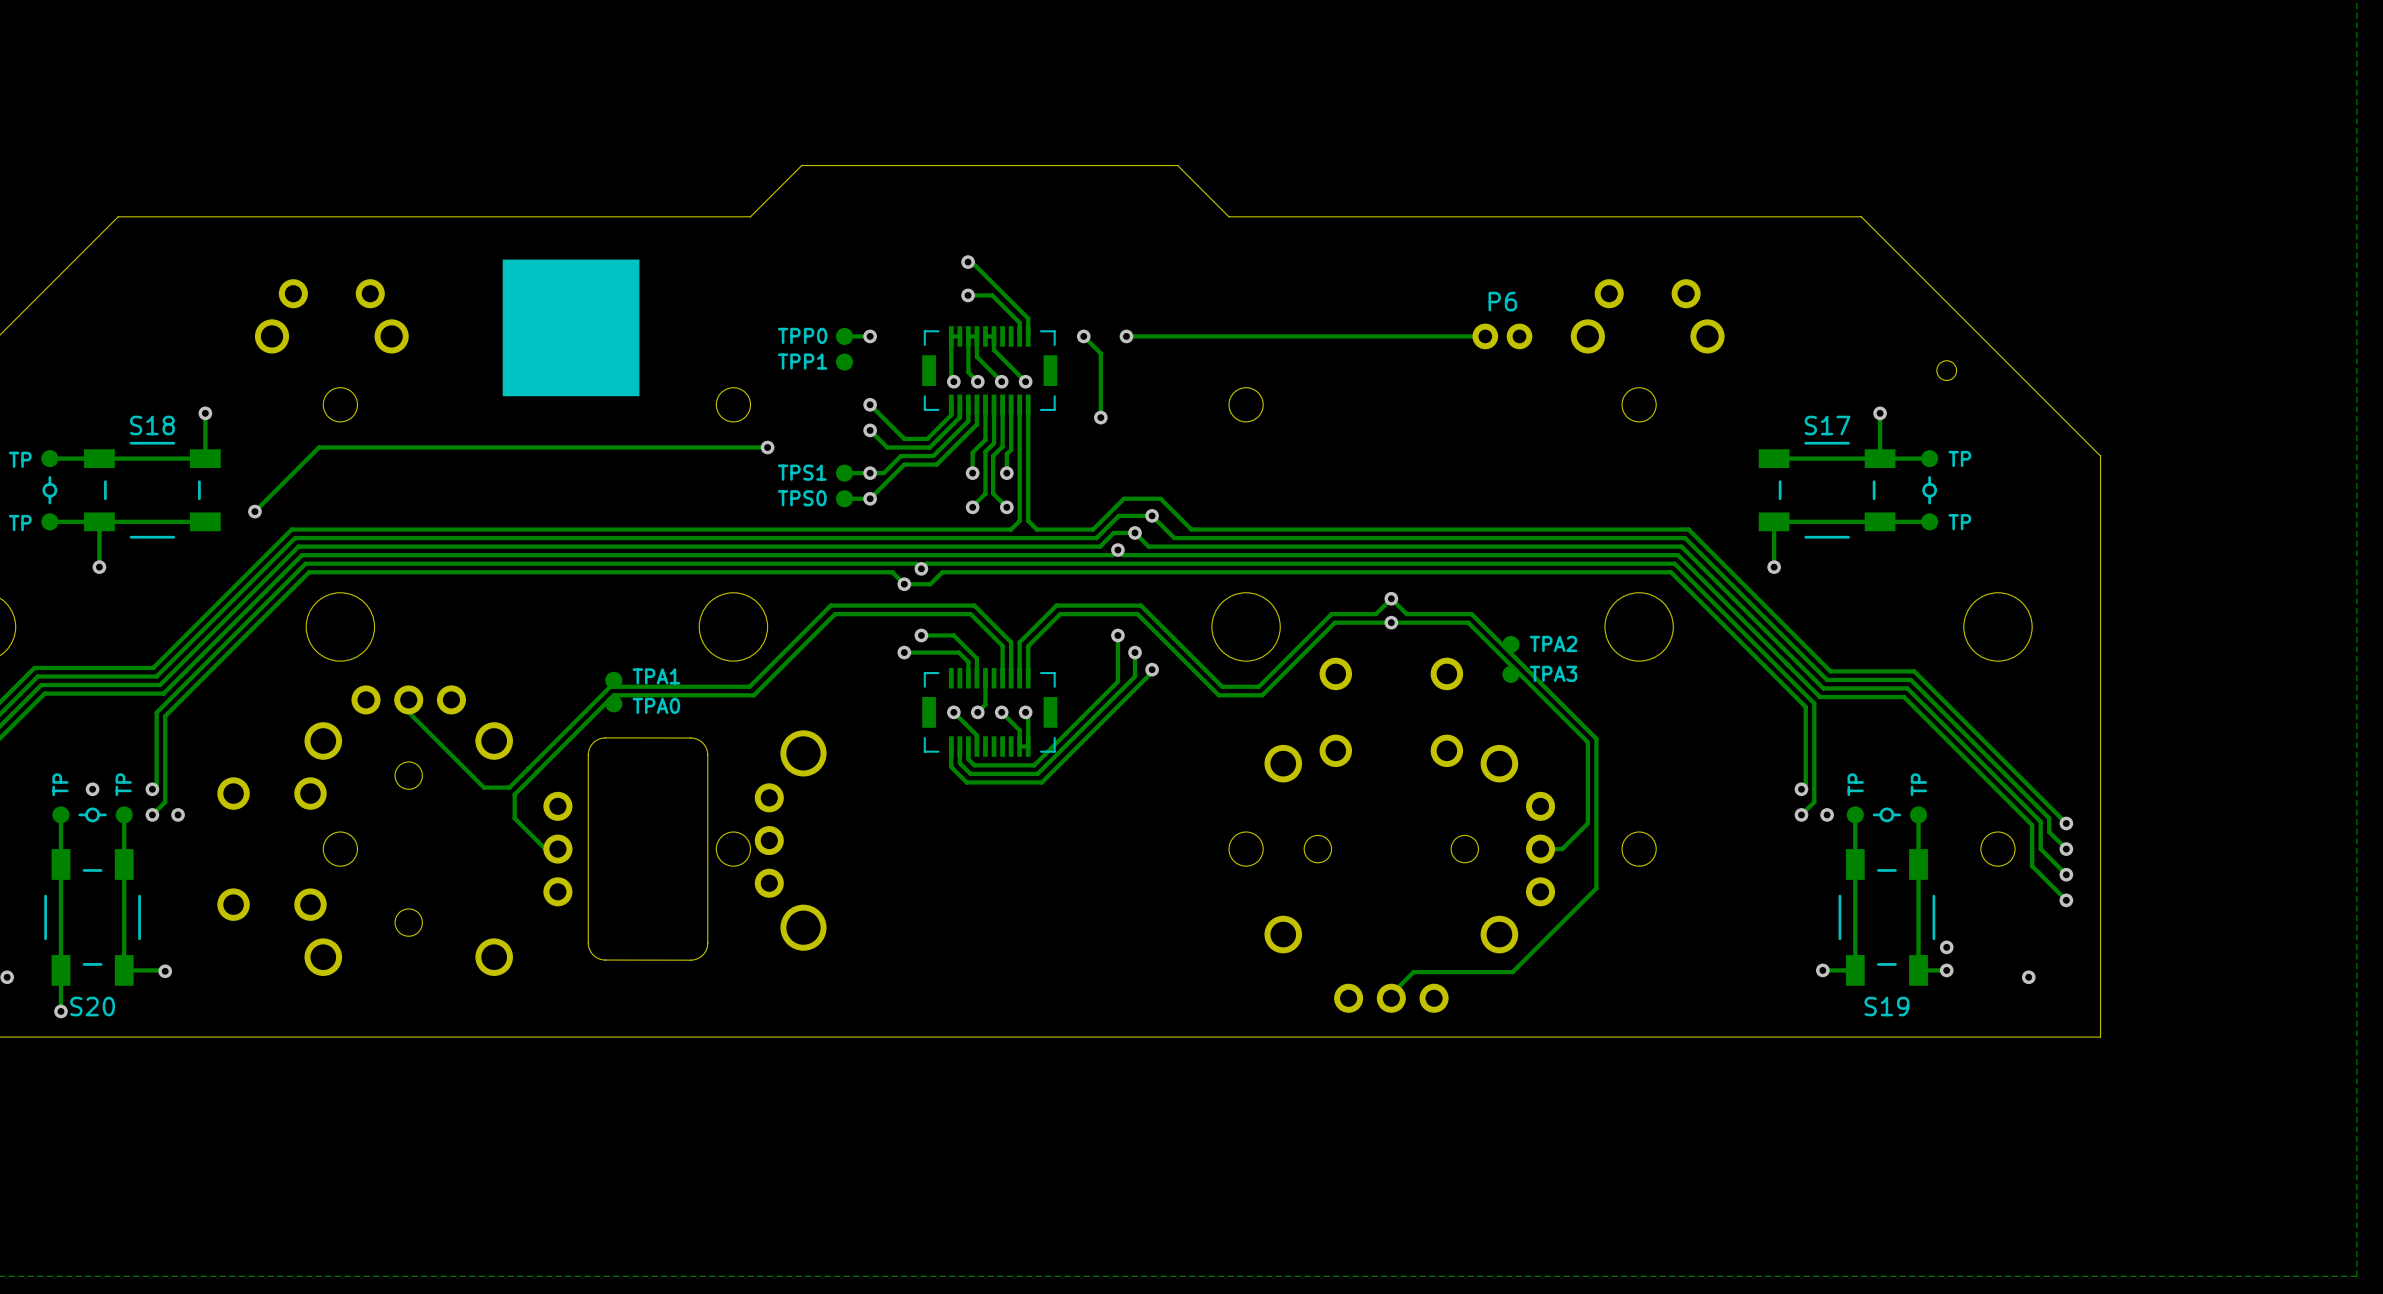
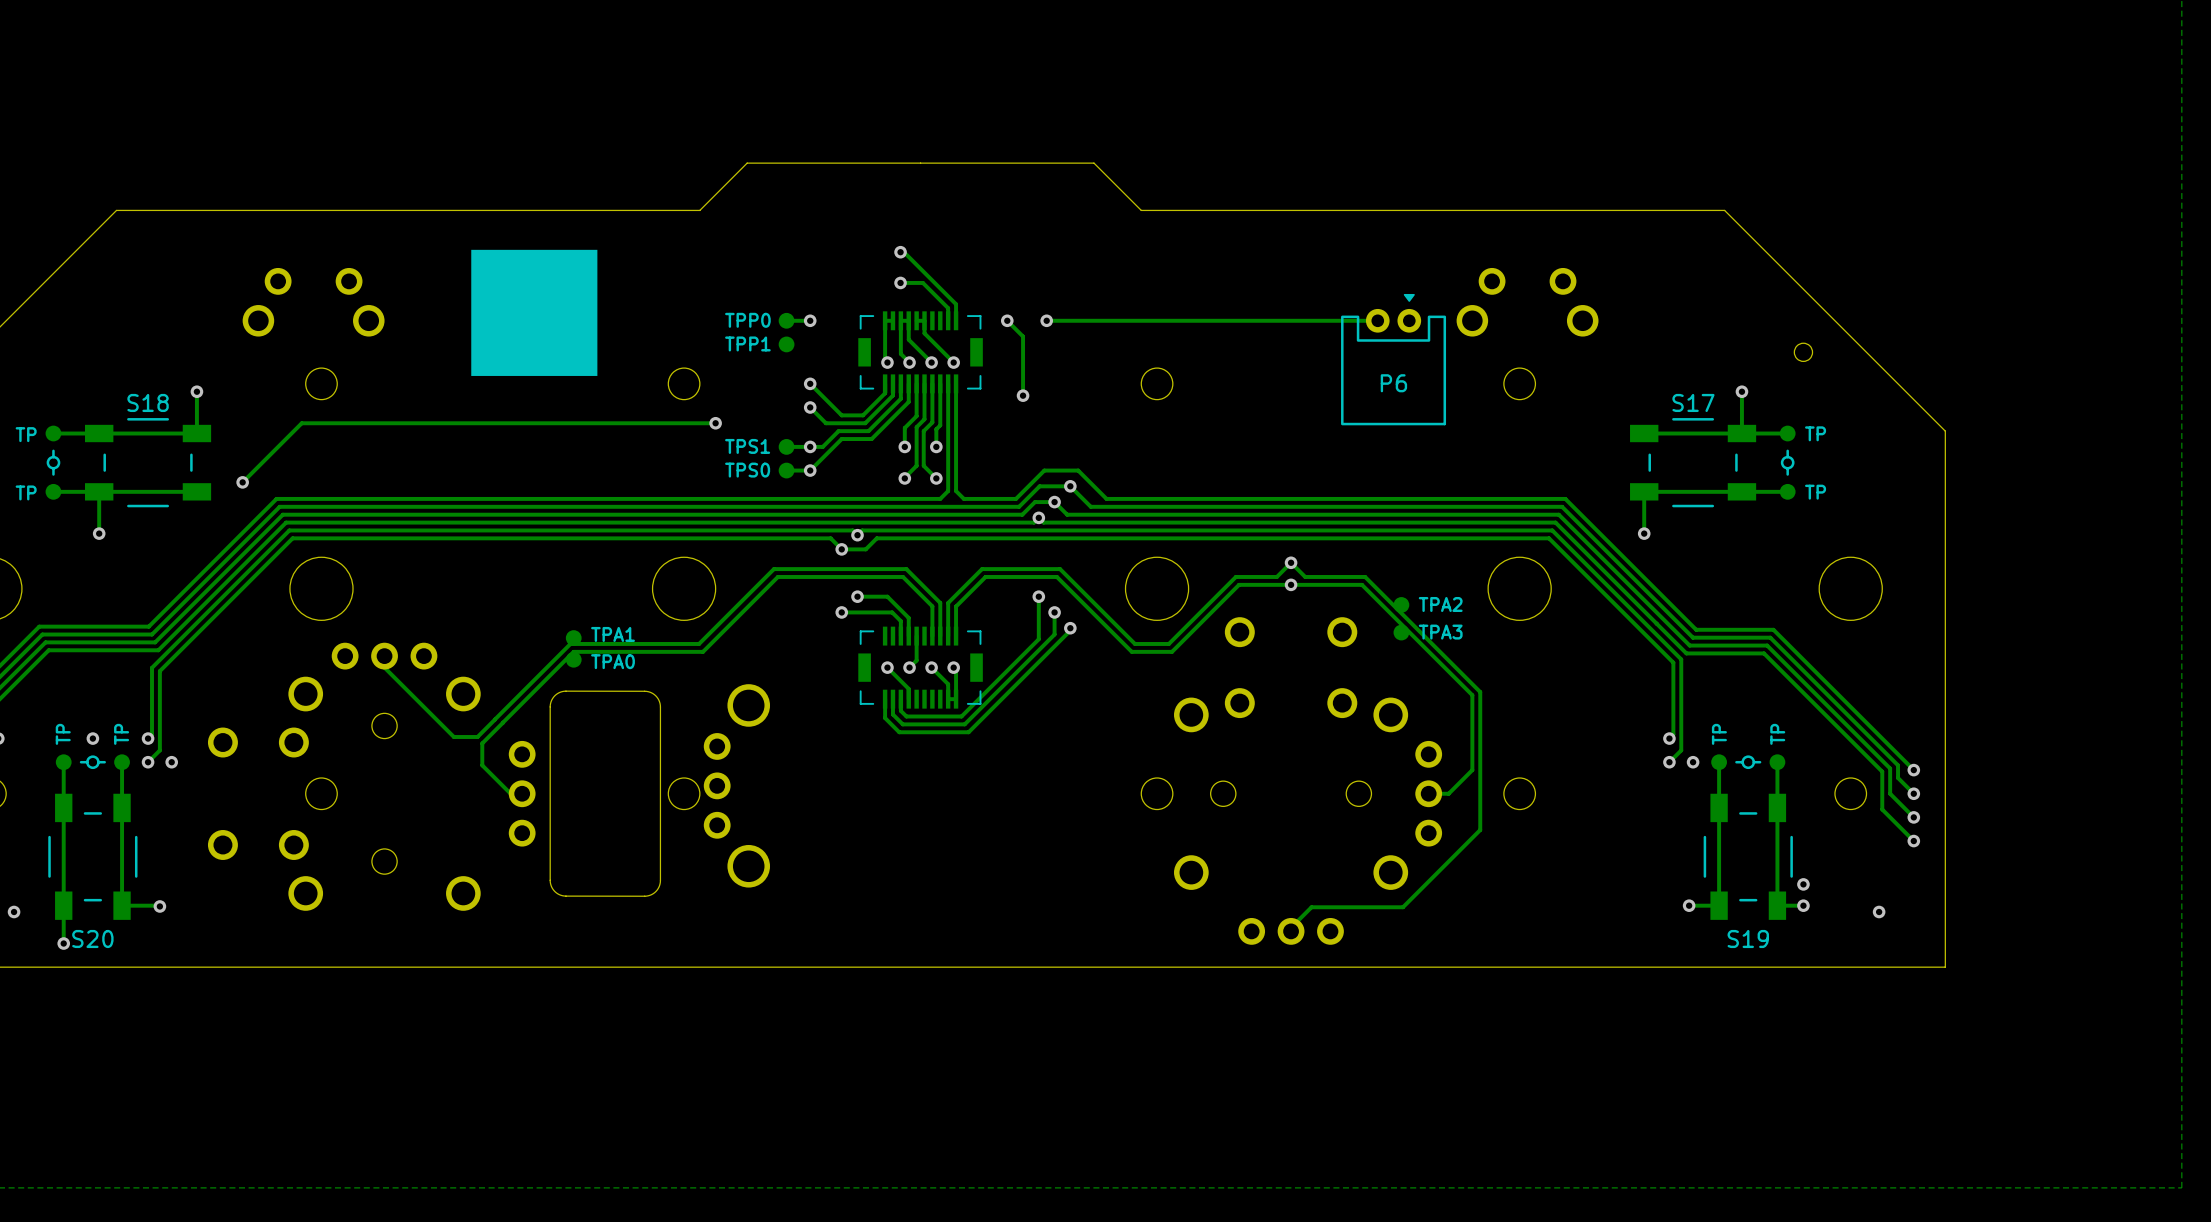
P6 name position: P6 (1502, 301) -> P6 (1393, 383)
P6 footprint: [1472, 323, 1533, 350] -> [1341, 293, 1447, 426]

